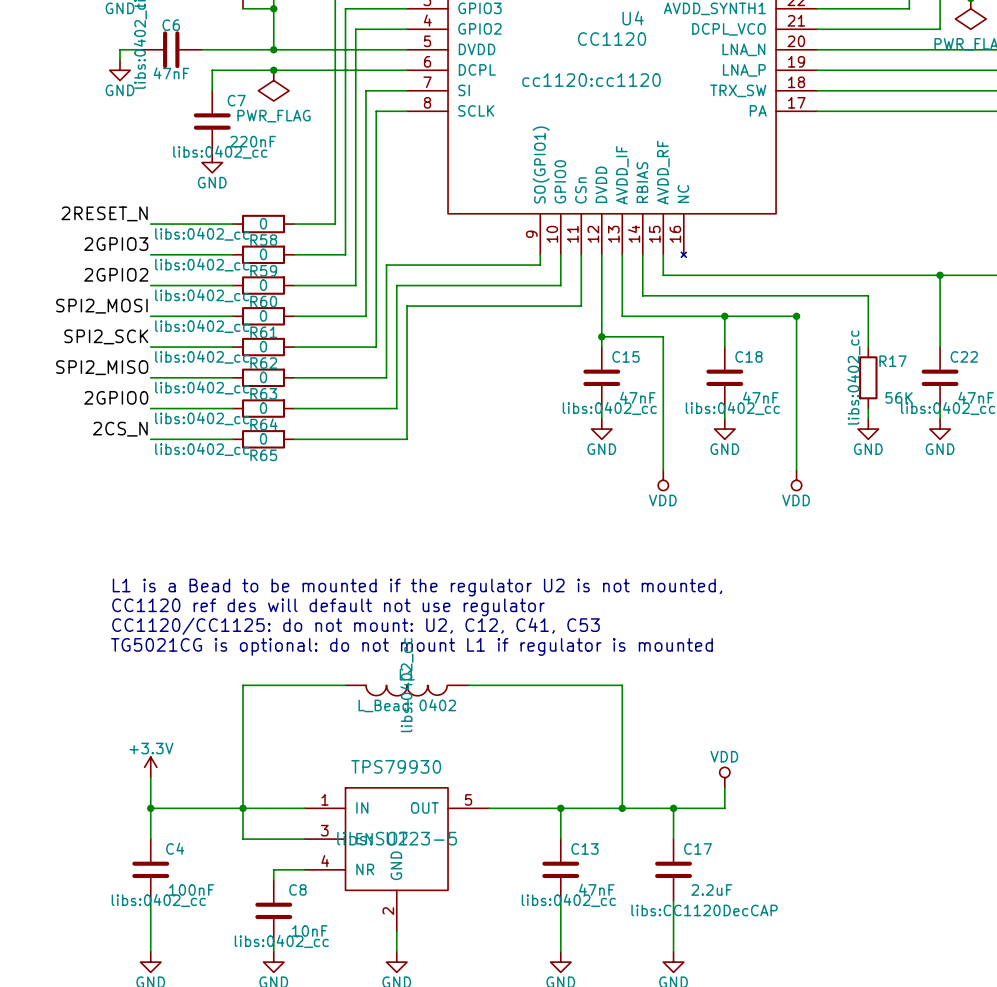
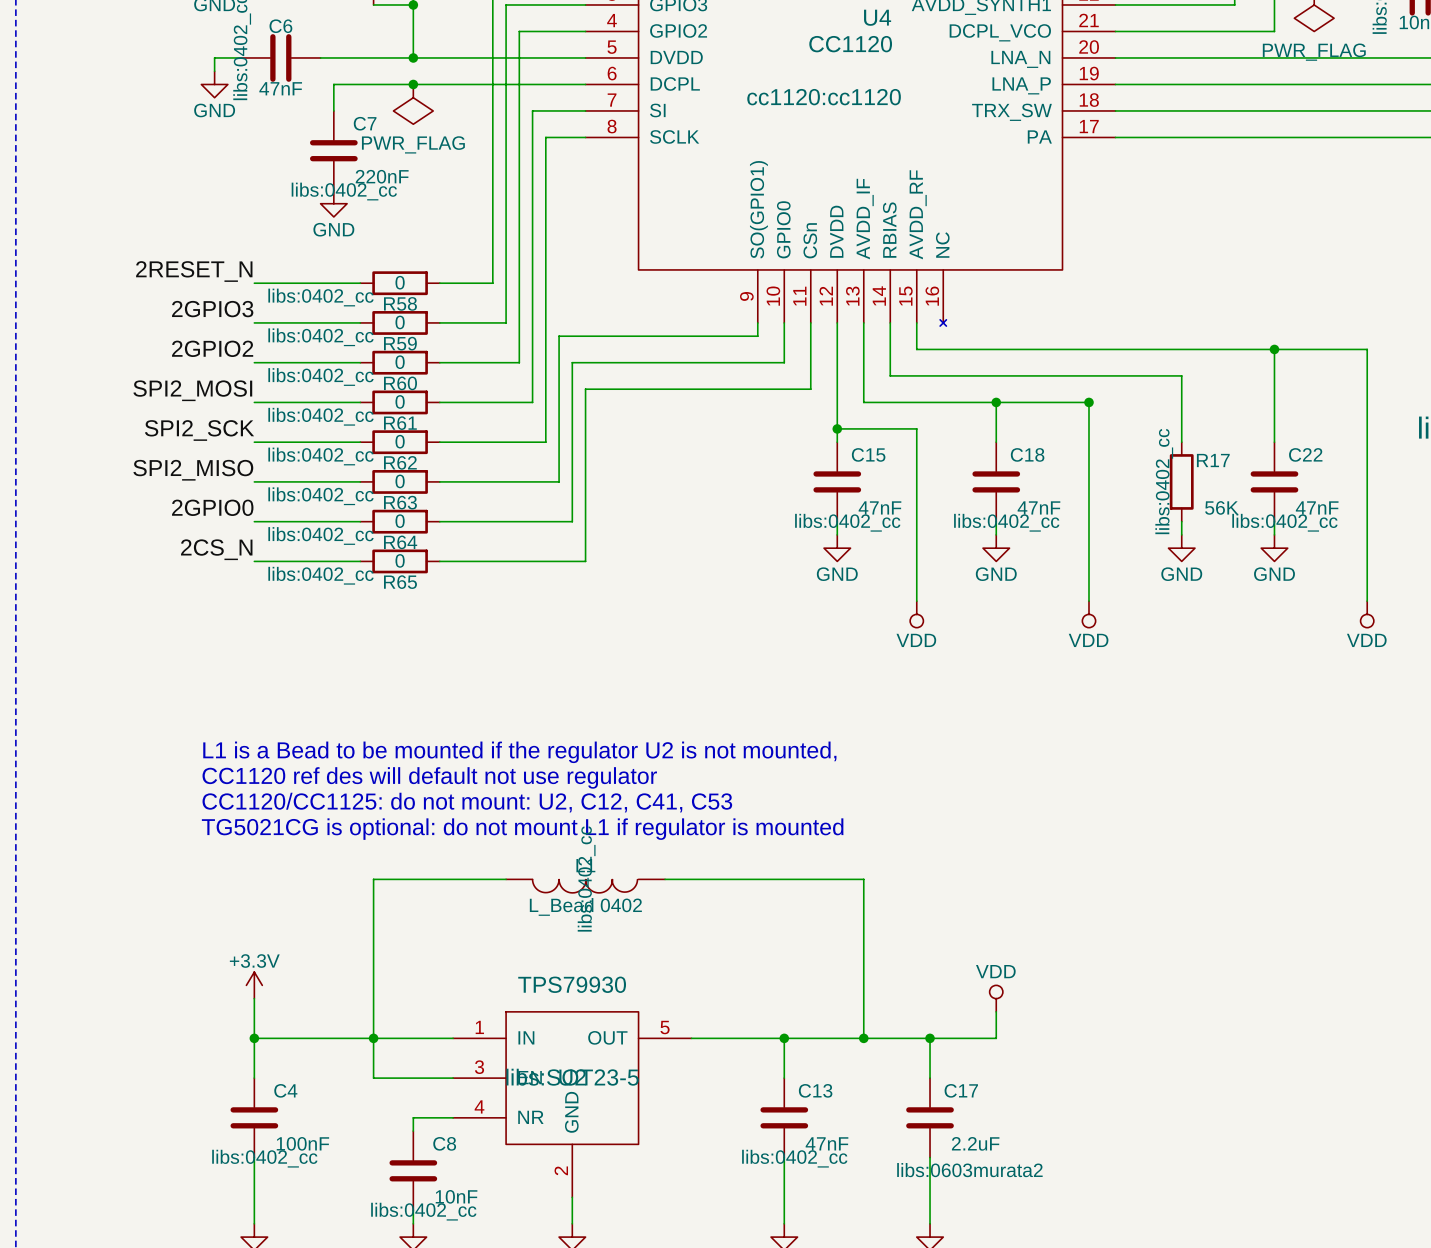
C17 text: libs:CC1120DecCAP (704, 910) -> libs:0603murata2 (969, 1170)

